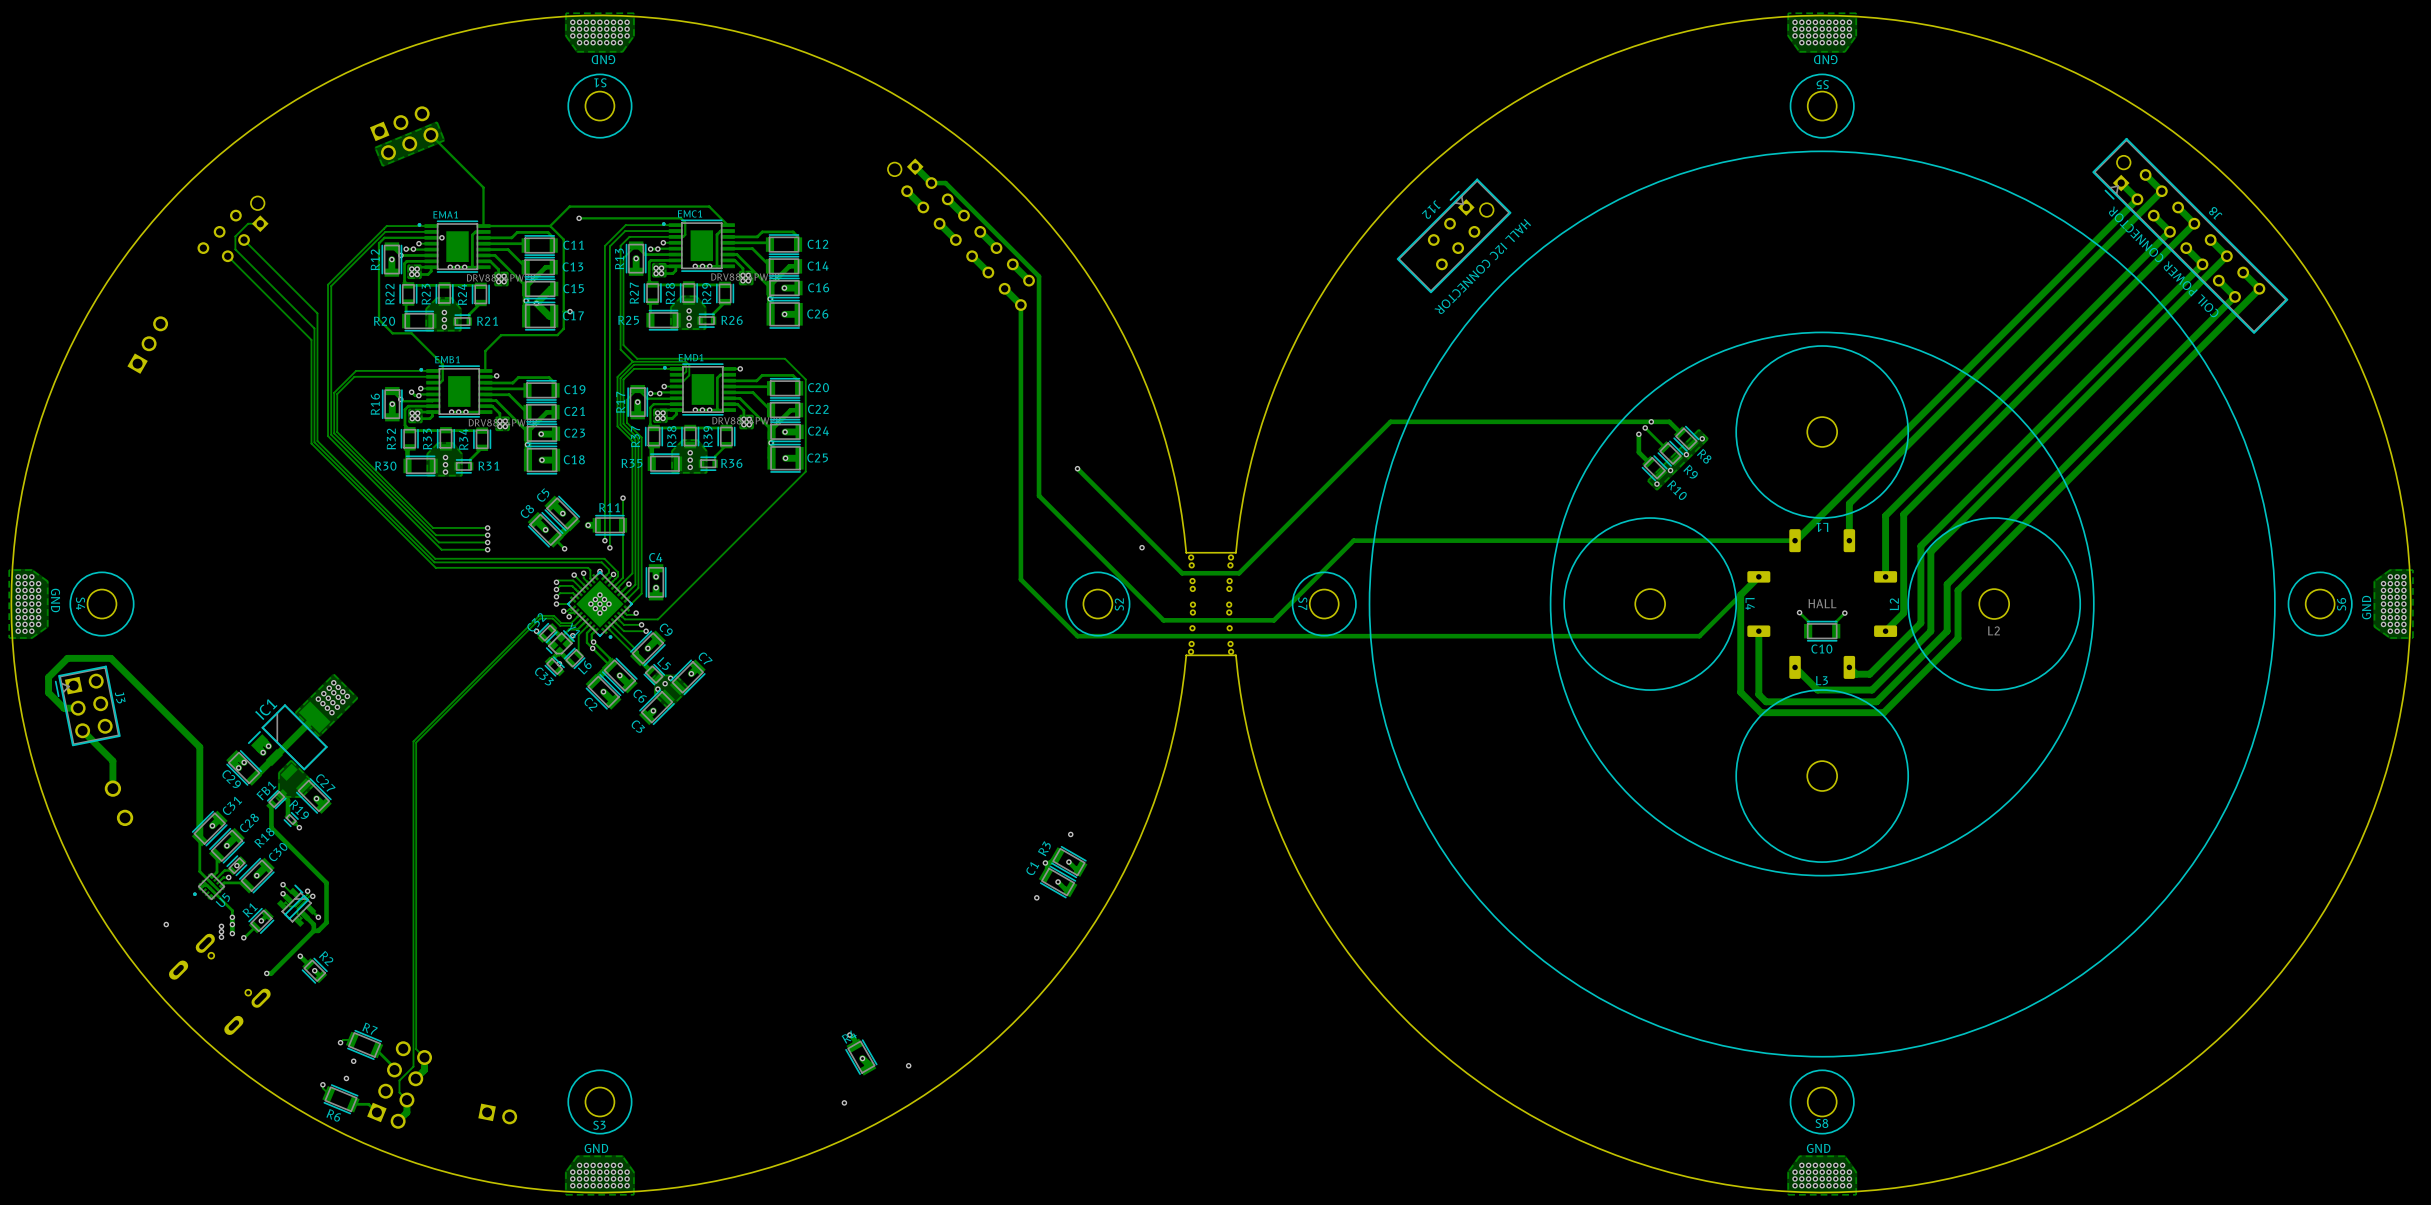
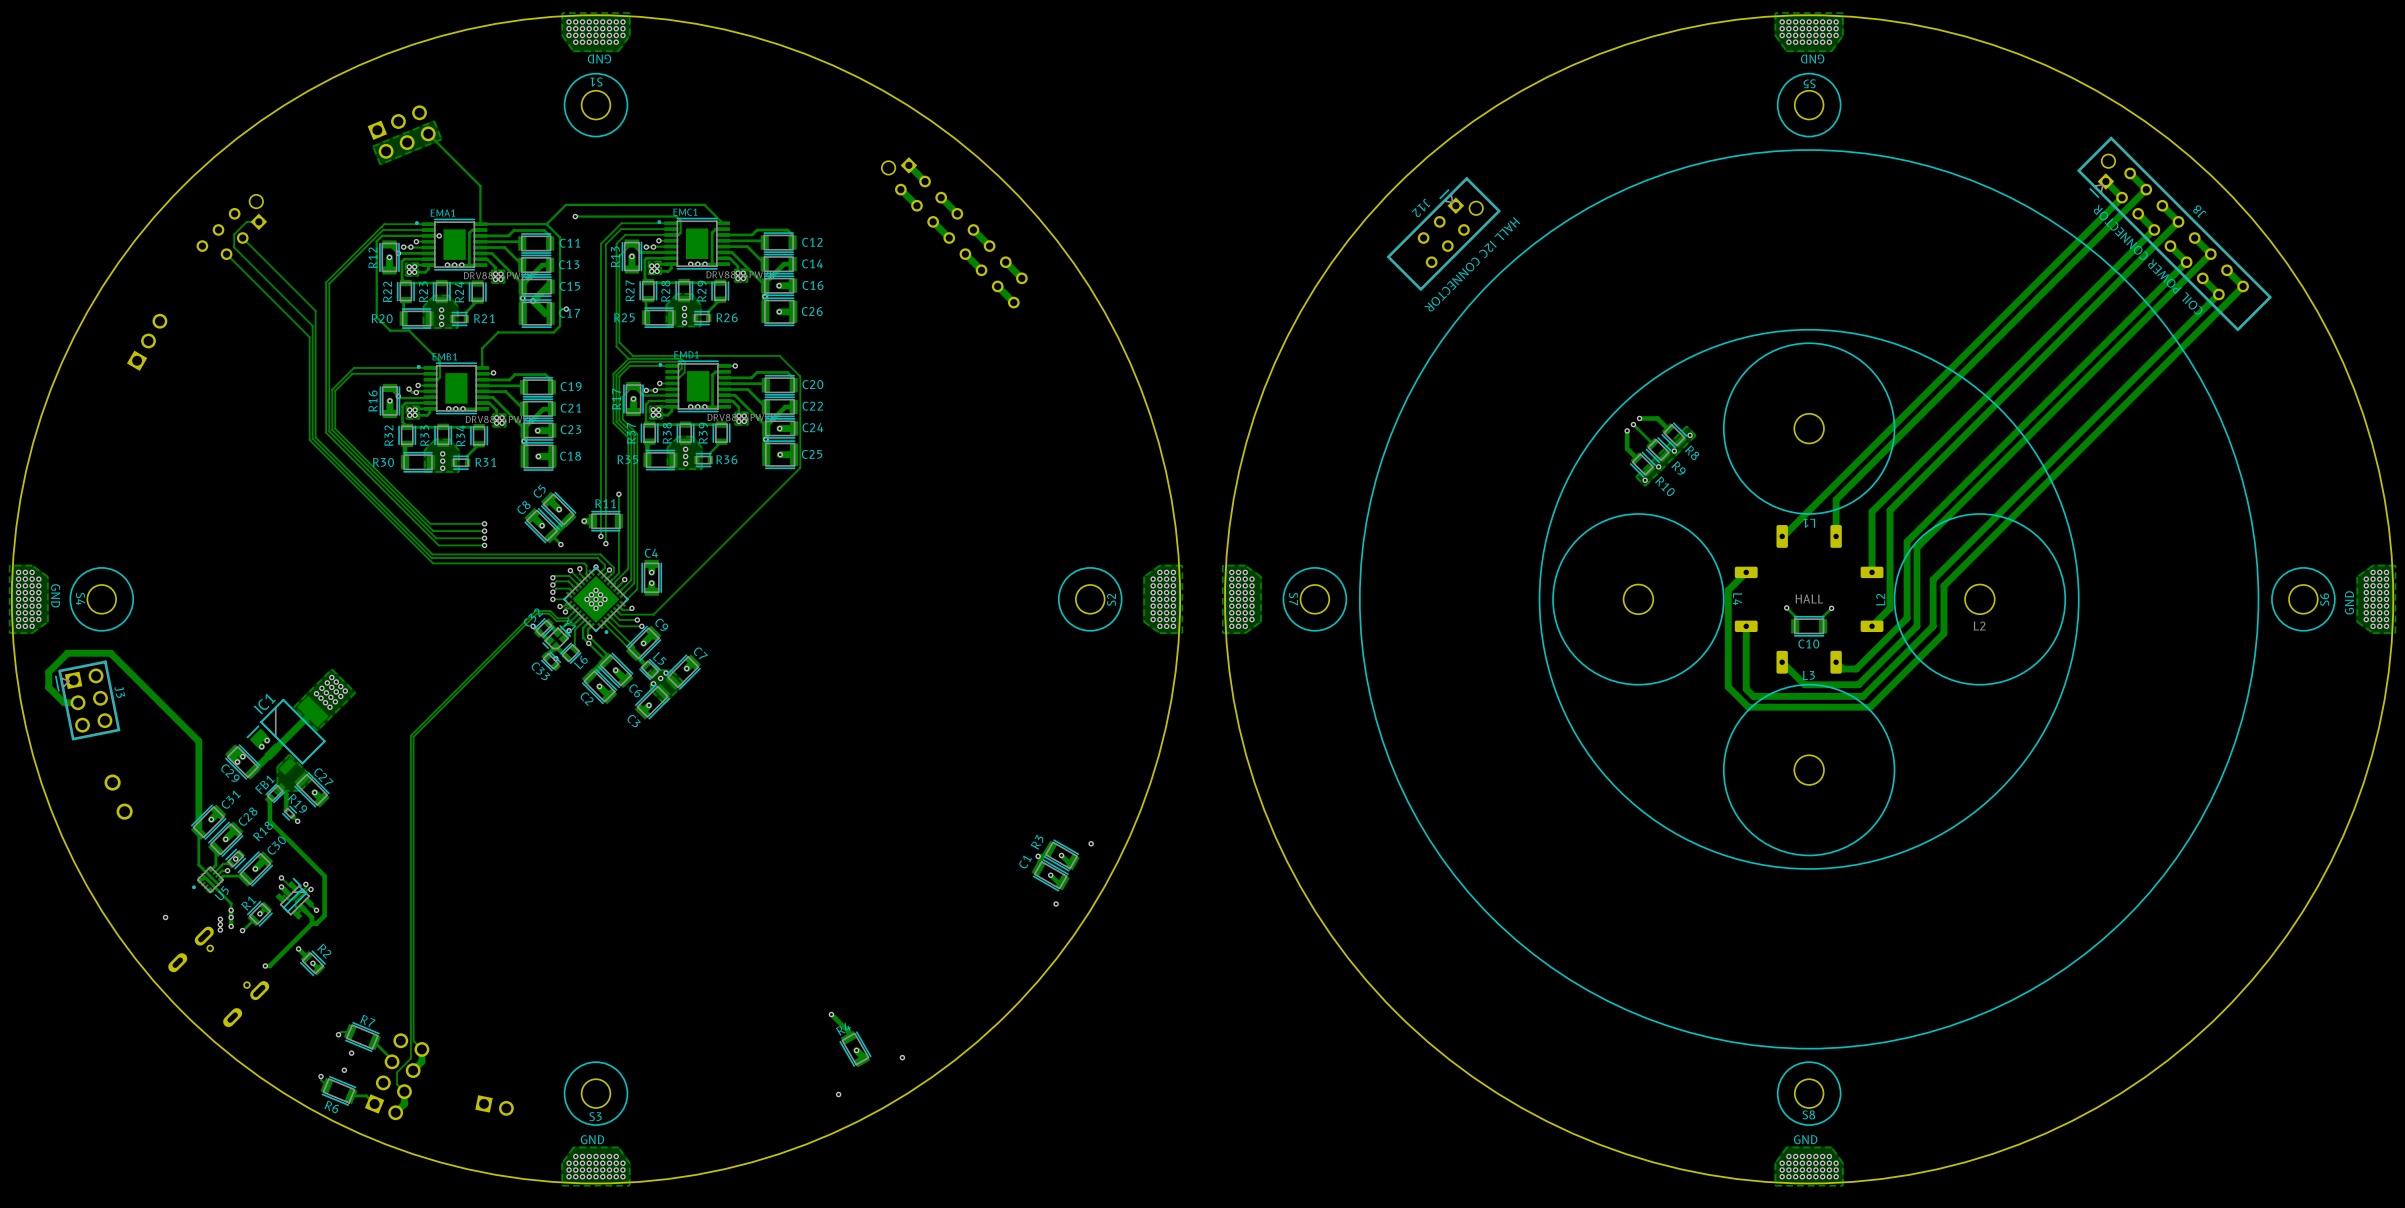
round board edge: none -> [10, 14, 1182, 1185]
round board edge: none -> [1224, 14, 2395, 1185]
track: (931, 183) (945, 183) (1039, 276) (1039, 495) (1163, 620) (1273, 620) (1353, 540) (1795, 540) -> none
track: (1020, 305) (1020, 579) (1077, 636) (1699, 636) (1758, 576) -> none
track: (1651, 421) (1390, 421) (1239, 573) (1182, 573) (1077, 468) -> none
via: (1077, 468) -> none
via: (1142, 547) -> none
board edge: (1235, 552) (1186, 552) (1174, 477) (1160, 423) (1140, 370) (1114, 319) (1085, 270) (1050, 225) (998, 171) (955, 134) (908, 102) (858, 75) (806, 52) (770, 40) (715, 26) (659, 18) (602, 15) (545, 17) (489, 25) (416, 44) (363, 65) (312, 90) (264, 120) (219, 154) (178, 193) (140, 236) (107, 282) (78, 331) (54, 382) (35, 436) (22, 491) (14, 547) (11, 604) (14, 660) (22, 716) (35, 771) (54, 825) (78, 877) (97, 909) (128, 956) (165, 1000) (205, 1040) (249, 1076) (296, 1108) (346, 1135) (398, 1157) (452, 1173) (508, 1185) (545, 1190) (602, 1192) (659, 1189) (715, 1181) (770, 1167) (823, 1148) (875, 1124) (908, 1105) (955, 1073) (998, 1037) (1038, 996) (1074, 952) (1105, 905) (1132, 855) (1153, 802) (1165, 766) (1178, 711) (1186, 655) (1235, 655) (1243, 711) (1262, 784) (1289, 855) (1316, 905) (1348, 952) (1396, 1010) (1437, 1049) (1498, 1095) (1546, 1124) (1615, 1155) (1669, 1172) (1744, 1187) (1800, 1192) (1857, 1191) (1913, 1185) (1987, 1168) (2058, 1142) (2109, 1117) (2141, 1098) (2202, 1053) (2230, 1027) (2269, 986) (2304, 941) (2324, 909) (2343, 876) (2367, 825) (2391, 753) (2399, 716) (2407, 660) (2410, 604) (2407, 547) (2399, 491) (2386, 436) (2360, 365) (2334, 314) (2304, 266) (2269, 221) (2230, 180) (2187, 142) (2141, 109) (2092, 81) (2041, 57) (1987, 39) (1932, 25) (1876, 18) (1819, 15) (1762, 18) (1706, 26) (1651, 40) (1598, 59) (1530, 93) (1482, 123) (1437, 158) (1396, 197) (1359, 240) (1326, 286) (1298, 335) (1274, 387) (1256, 441) (1243, 496) (1235, 552) -> none
part: (1191, 557) -> none
part: (1231, 557) -> none
part: (1191, 565) -> none
part: (1230, 565) -> none
zone outline: none -> (1182, 565) (1159, 565) (1144, 576) (1144, 621) (1159, 633) (1182, 633) (1182, 565)
zone outline: none -> (1245, 565) (1222, 565) (1222, 633) (1245, 633) (1260, 621) (1260, 576) (1245, 565)
via: none -> (1159, 572)
via: none -> (1166, 572)
via: none -> (1173, 572)
via: none -> (1231, 572)
via: none -> (1238, 572)
via: none -> (1245, 572)
part: (1192, 581) -> none
part: (1229, 581) -> none
via: none -> (1153, 579)
via: none -> (1159, 579)
via: none -> (1166, 579)
via: none -> (1173, 579)
via: none -> (1231, 579)
via: none -> (1238, 579)
via: none -> (1245, 579)
via: none -> (1251, 579)
part: (1192, 588) -> none
part: (1229, 588) -> none
via: none -> (1153, 585)
via: none -> (1159, 585)
via: none -> (1166, 585)
via: none -> (1173, 585)
via: none -> (1231, 585)
via: none -> (1238, 585)
via: none -> (1245, 585)
via: none -> (1251, 585)
via: none -> (1153, 592)
via: none -> (1159, 592)
via: none -> (1166, 592)
via: none -> (1173, 592)
via: none -> (1231, 592)
via: none -> (1238, 592)
via: none -> (1245, 592)
via: none -> (1251, 592)
via: none -> (1153, 599)
via: none -> (1159, 599)
via: none -> (1166, 599)
via: none -> (1173, 599)
part: (1192, 604) -> none
part: (1229, 604) -> none
via: none -> (1231, 599)
via: none -> (1238, 599)
via: none -> (1245, 599)
via: none -> (1251, 599)
via: none -> (1153, 606)
via: none -> (1159, 606)
via: none -> (1166, 606)
via: none -> (1173, 606)
via: none -> (1231, 606)
via: none -> (1238, 606)
via: none -> (1245, 606)
via: none -> (1251, 606)
part: (1192, 612) -> none
part: (1229, 612) -> none
via: none -> (1153, 612)
via: none -> (1159, 612)
via: none -> (1166, 612)
via: none -> (1173, 612)
via: none -> (1231, 612)
via: none -> (1238, 612)
via: none -> (1245, 612)
via: none -> (1251, 612)
via: none -> (1153, 619)
via: none -> (1159, 619)
via: none -> (1166, 619)
via: none -> (1173, 619)
via: none -> (1231, 619)
via: none -> (1238, 619)
via: none -> (1245, 619)
via: none -> (1251, 619)
part: (1192, 628) -> none
part: (1229, 628) -> none
via: none -> (1159, 626)
via: none -> (1166, 626)
via: none -> (1173, 626)
via: none -> (1231, 626)
via: none -> (1238, 626)
via: none -> (1245, 626)
part: (1191, 643) -> none
part: (1230, 643) -> none
part: (1191, 651) -> none
part: (1231, 651) -> none
track: (82, 730) (112, 761) (112, 788) -> none
via position: (1070, 834) -> (1091, 843)
via position: (1036, 897) -> (1056, 903)
track: none -> (831, 1014) (844, 1027)
via position: (849, 1034) -> (831, 1014)

